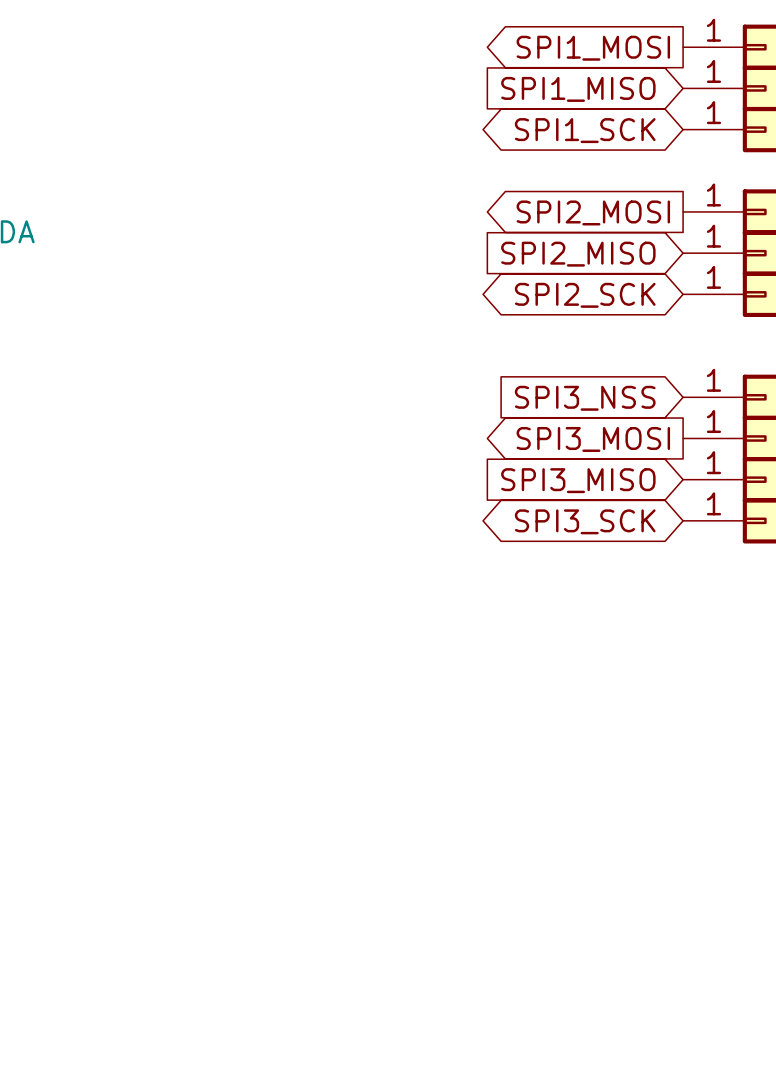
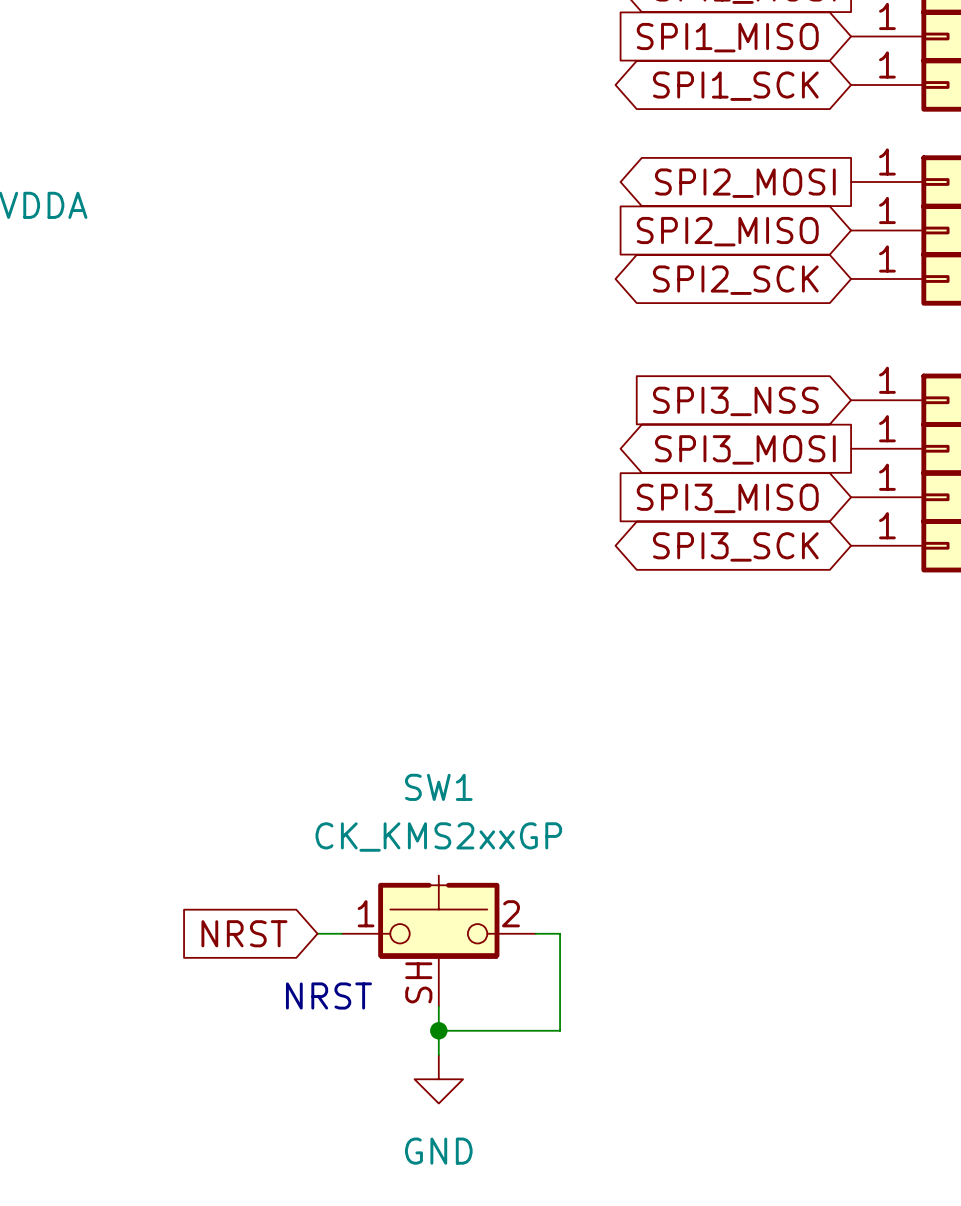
global label: none -> NRST (244, 933)
wire: none -> (317, 933) (341, 933)
wire: none -> (535, 933) (560, 933) (560, 1030) (438, 1030)
SW1: none -> CK_KMS2xxGP (438, 941)
text: none -> NRST (328, 995)
wire: none -> (438, 1006) (438, 1055)
junction: none -> (438, 1030)
power symbol: none -> GND (438, 1079)

